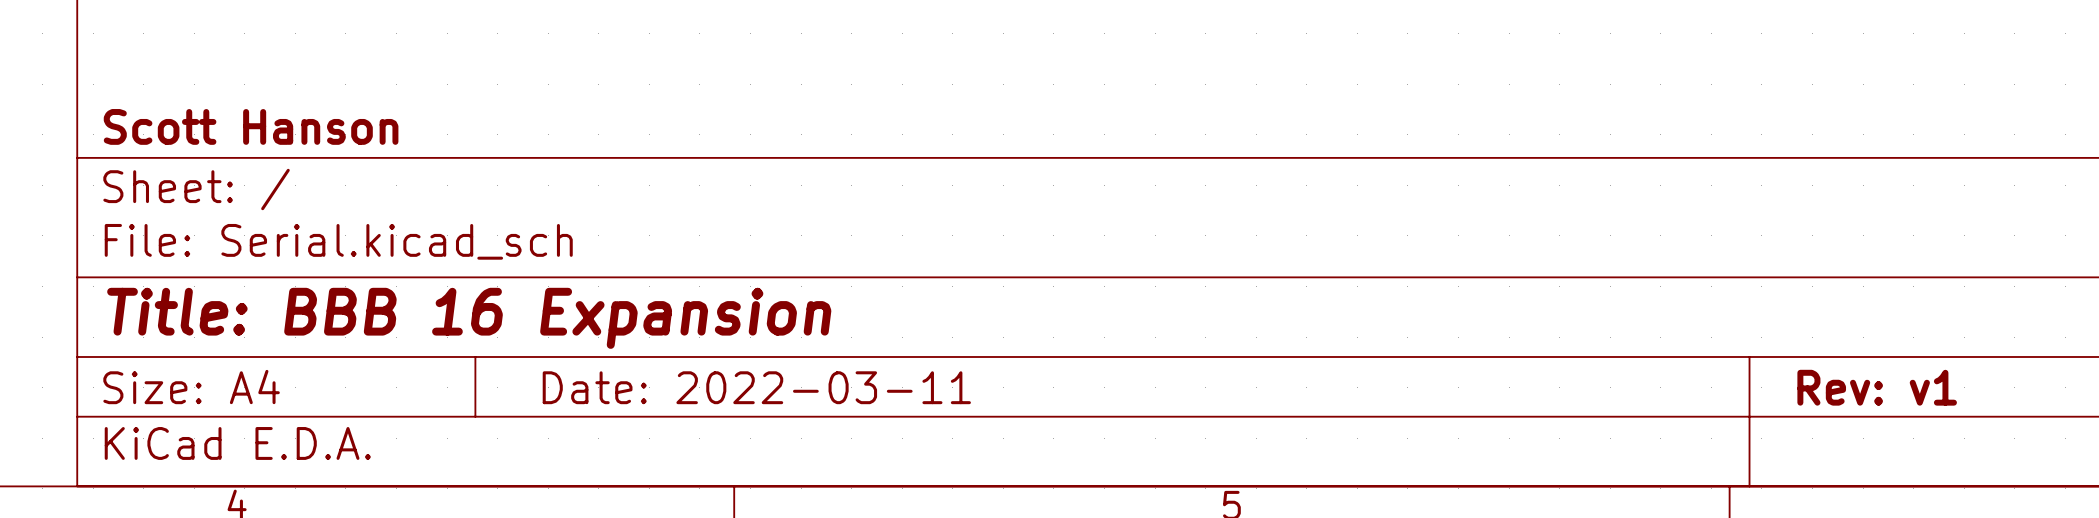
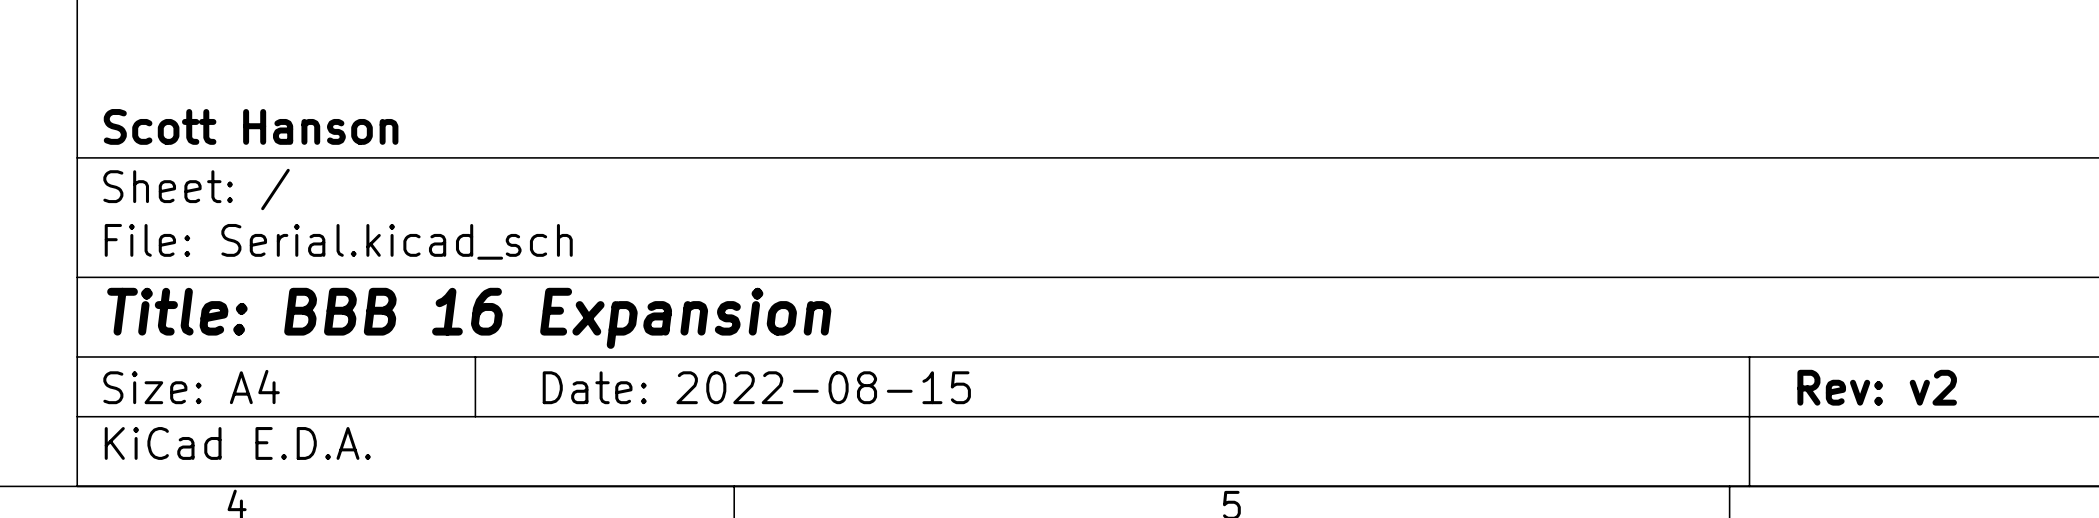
title block: Date: 2022-03-11 (756, 387) -> Date: 2022-08-15 (756, 387)
title block: Rev: v1 (1877, 387) -> Rev: v2 (1877, 387)

